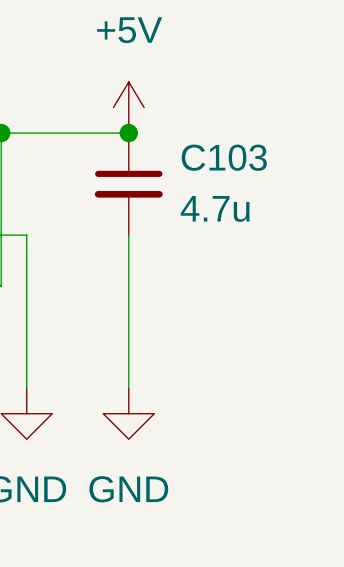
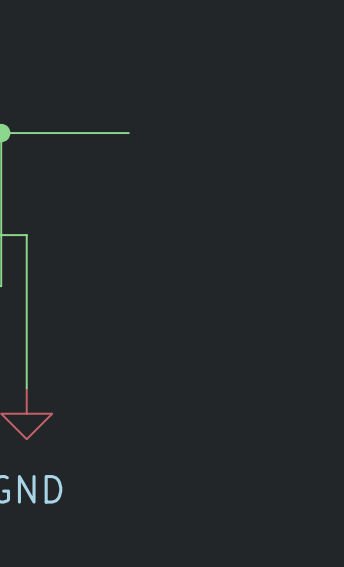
power symbol: +5V (128, 107) -> none
junction: (128, 133) -> none
C103: 4.7u (128, 184) -> none
wire: (128, 235) (128, 388) -> none
power symbol: GND (128, 413) -> none

